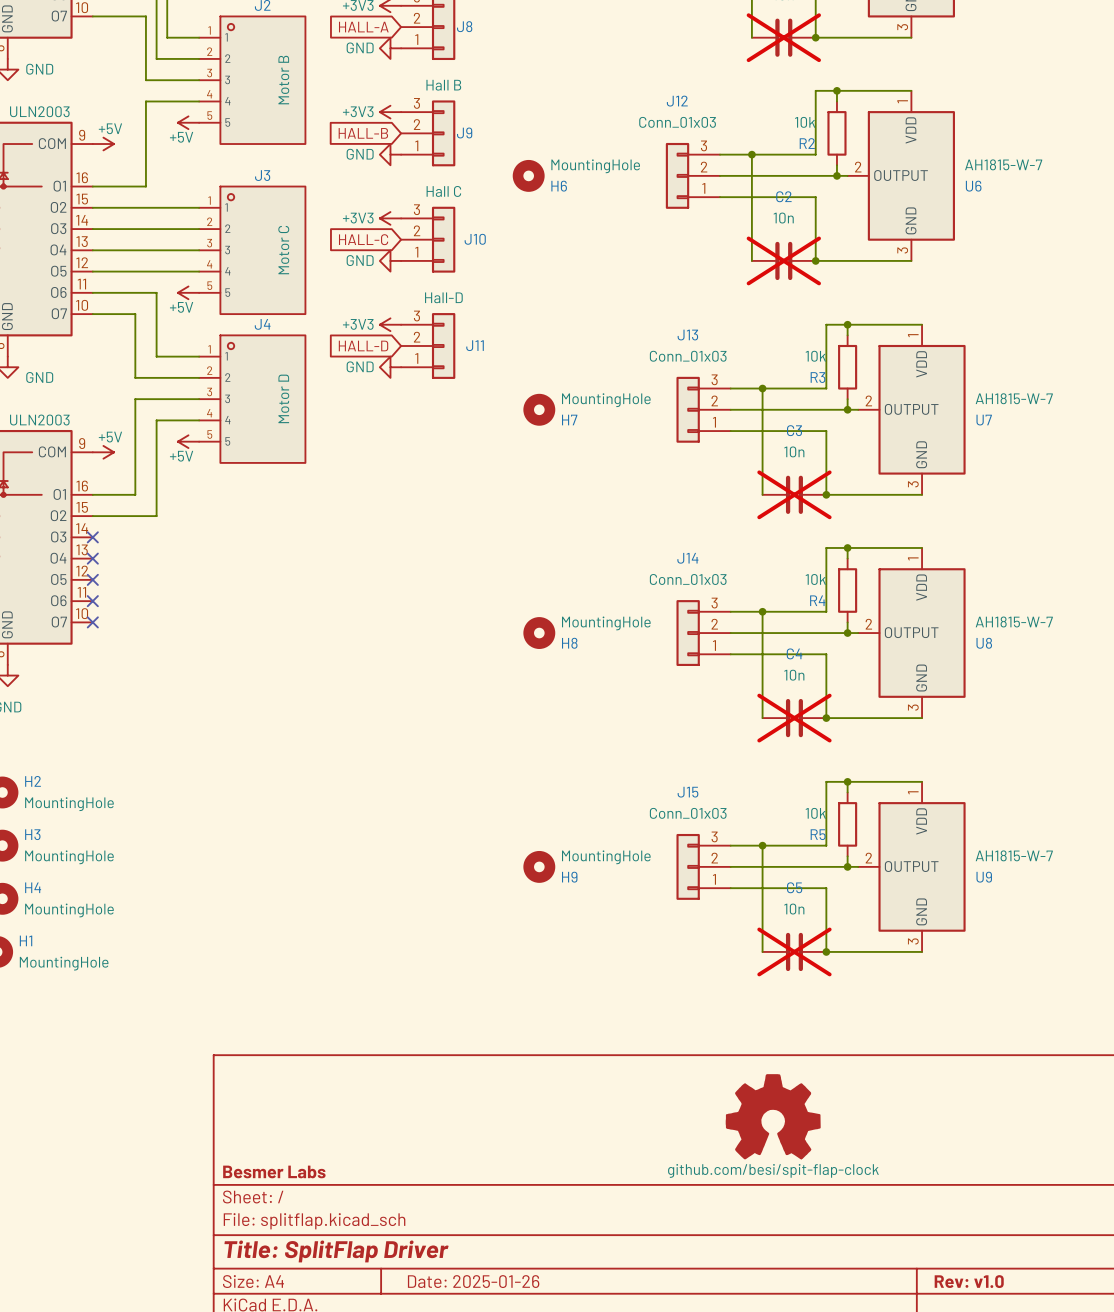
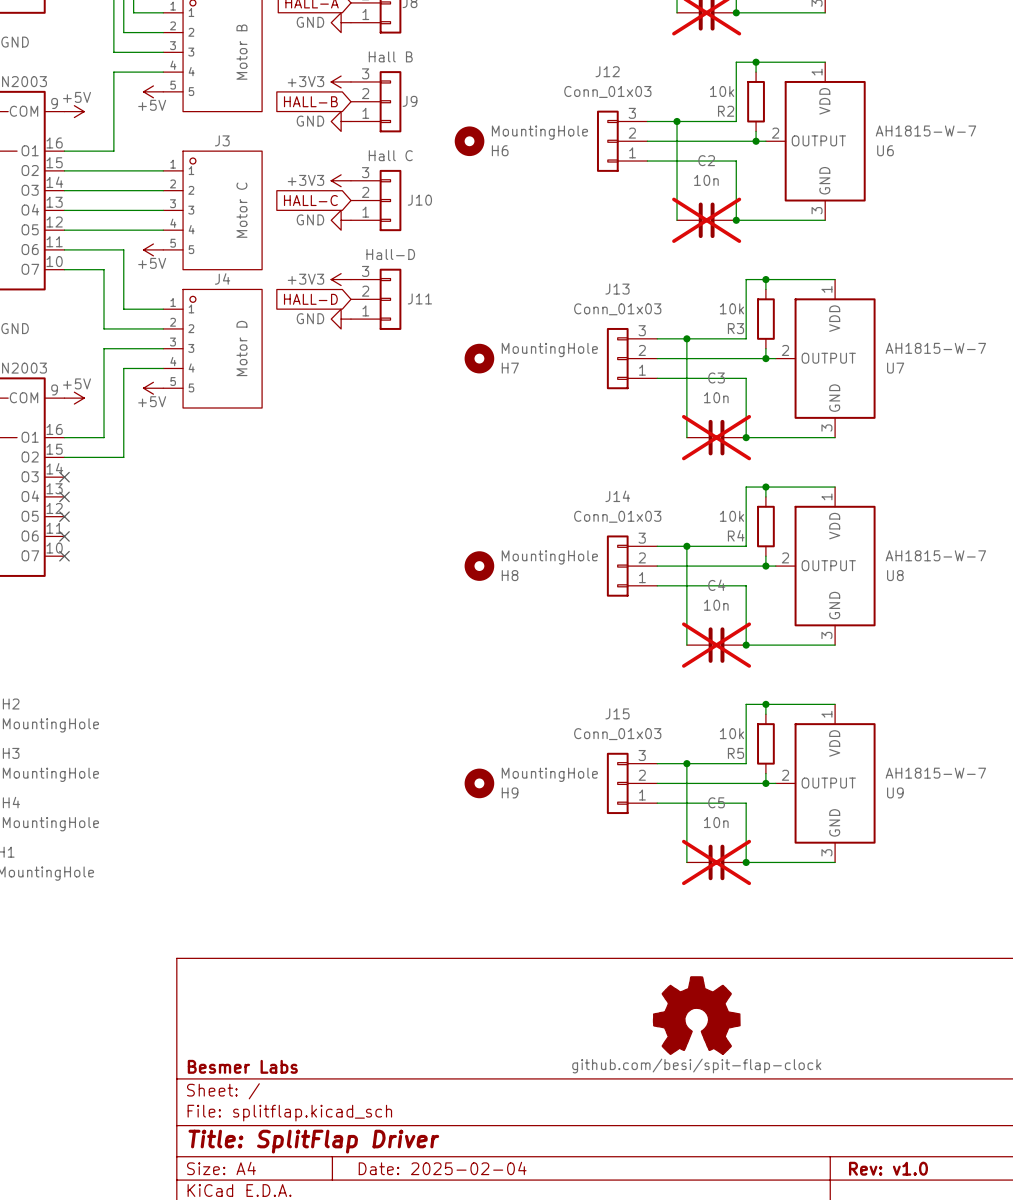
title block: Date: 2025-01-26 (473, 1281) -> Date: 2025-02-04 (442, 1168)

